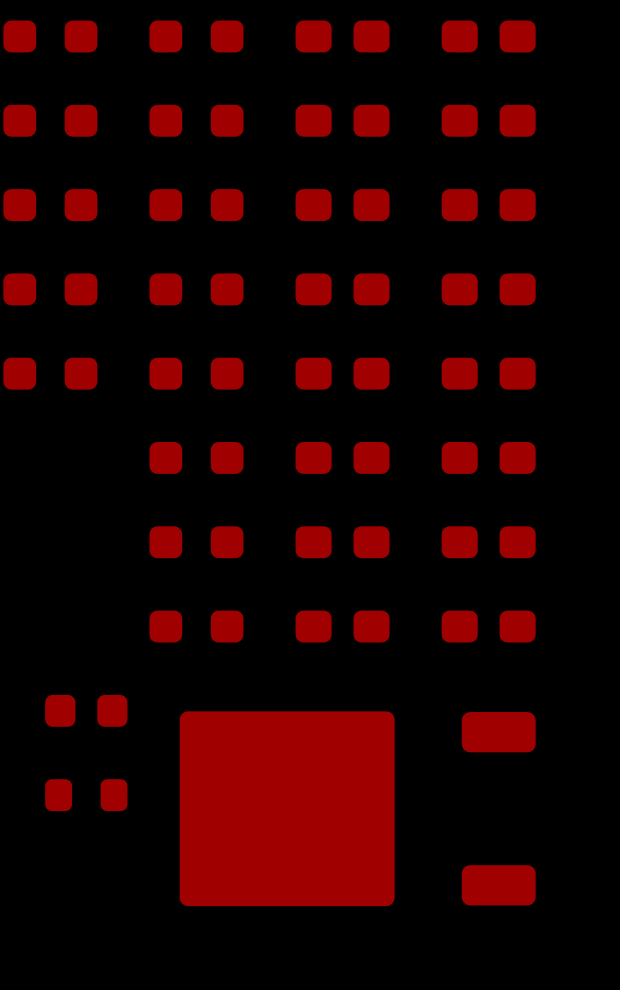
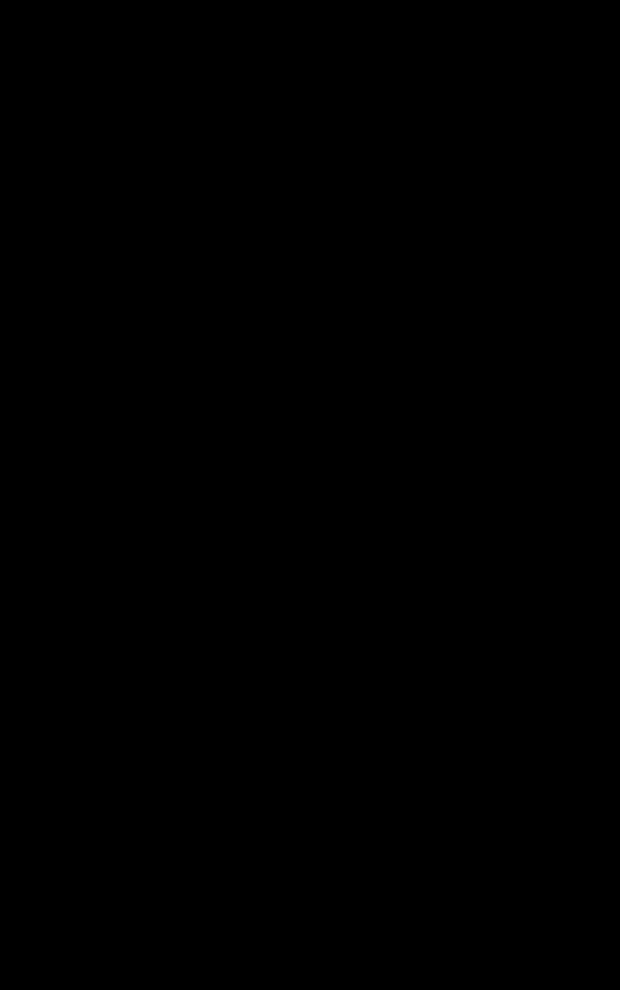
part: (50, 36) -> none
part: (196, 36) -> none
part: (342, 36) -> none
part: (488, 36) -> none
part: (50, 120) -> none
part: (196, 120) -> none
part: (342, 120) -> none
part: (488, 120) -> none
part: (50, 205) -> none
part: (196, 205) -> none
part: (342, 205) -> none
part: (488, 205) -> none
part: (50, 289) -> none
part: (196, 289) -> none
part: (342, 289) -> none
part: (488, 289) -> none
part: (50, 373) -> none
part: (196, 373) -> none
part: (342, 373) -> none
part: (488, 373) -> none
part: (196, 457) -> none
part: (342, 457) -> none
part: (488, 457) -> none
part: (196, 542) -> none
part: (342, 542) -> none
part: (488, 542) -> none
part: (196, 626) -> none
part: (342, 626) -> none
part: (488, 626) -> none
part: (86, 710) -> none
part: (86, 795) -> none
part: (357, 808) -> none

